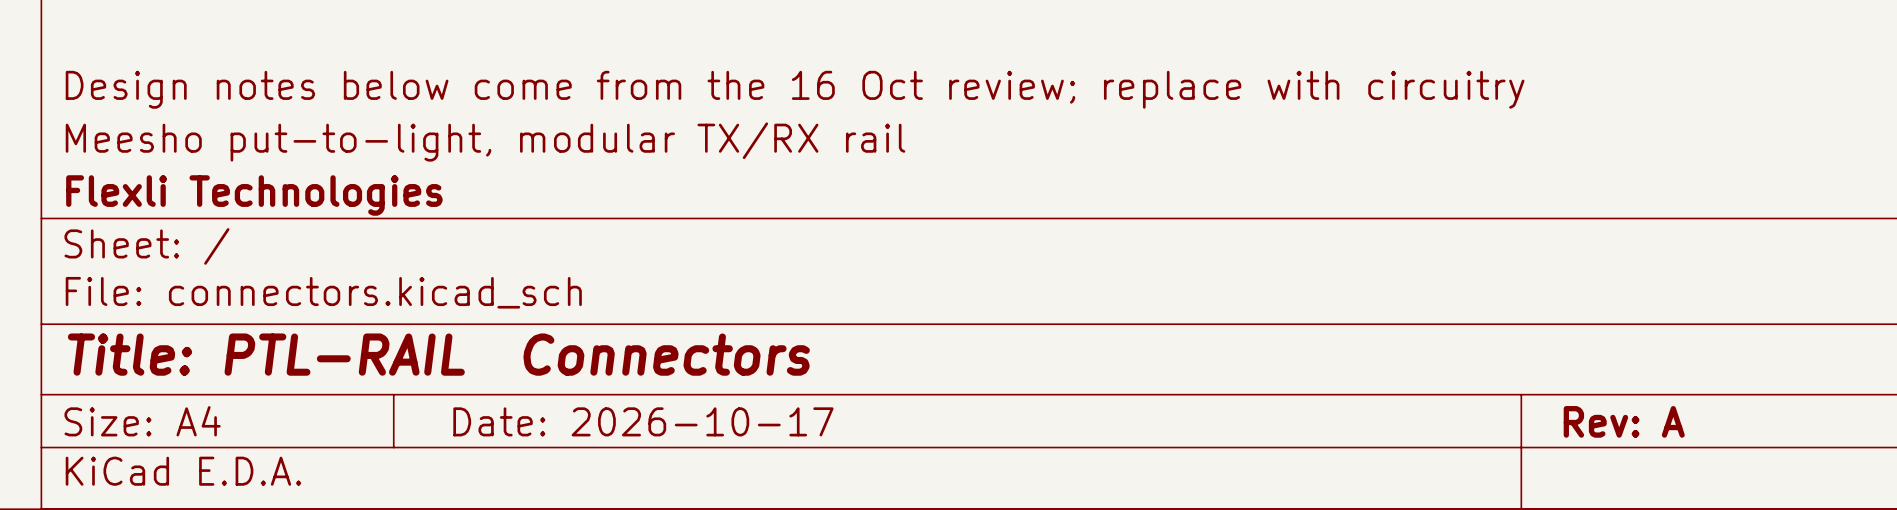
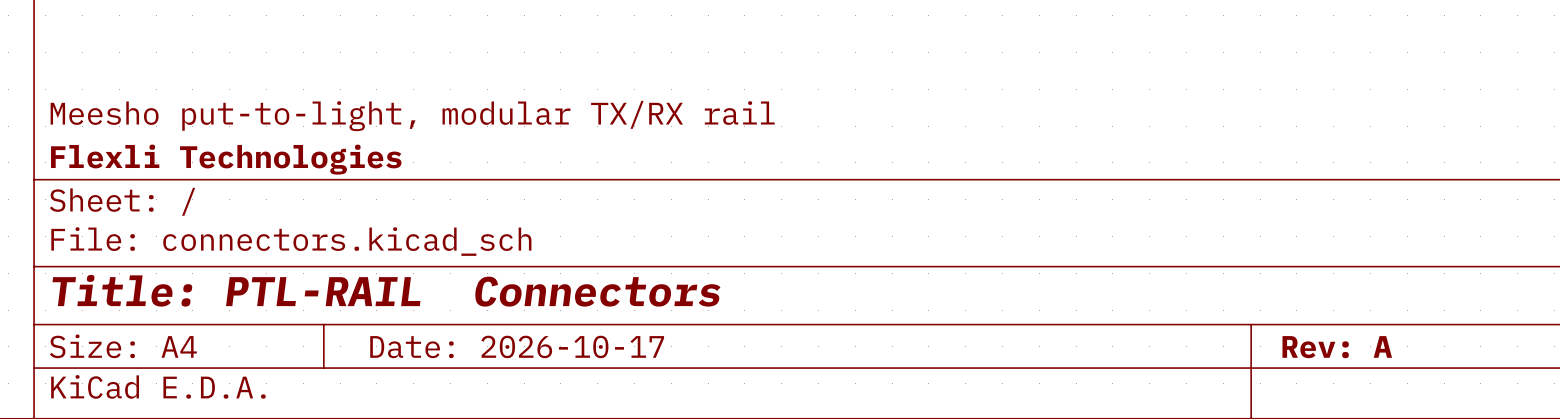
title block: Design notes below come from the 16 Oct review; replace with circuitry (795, 89) -> none

